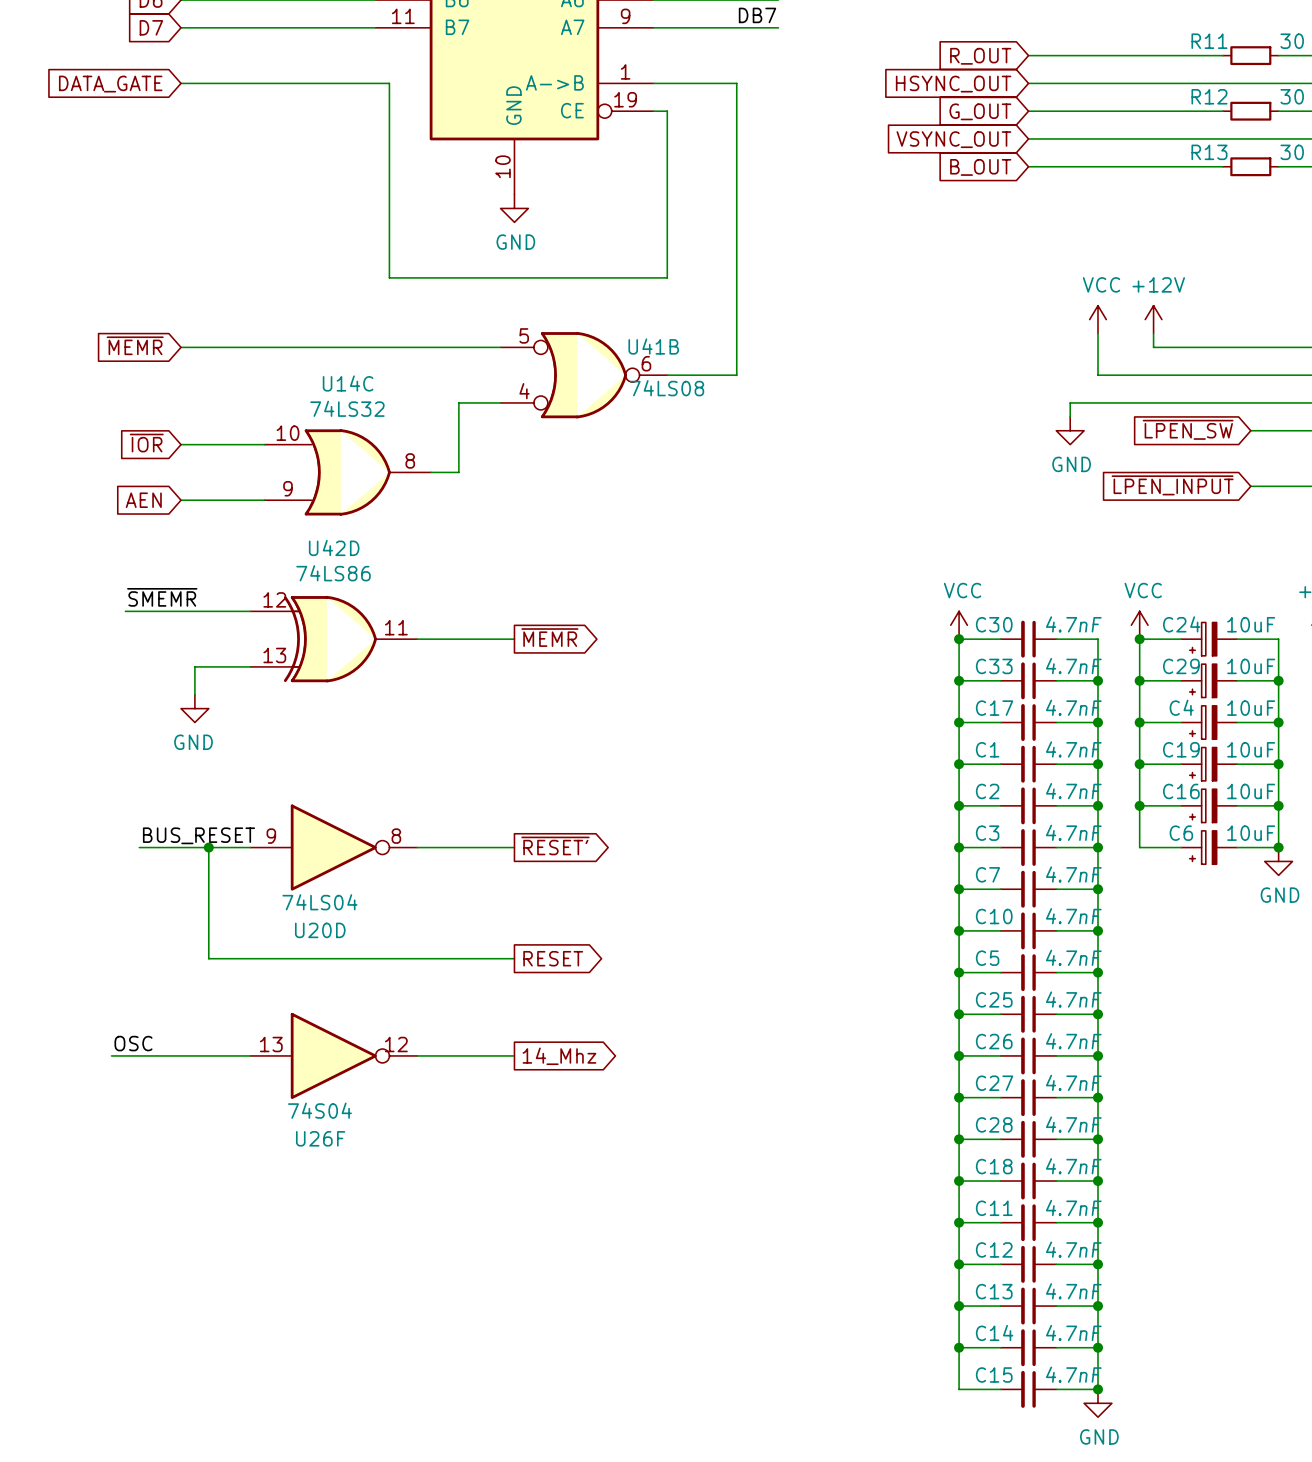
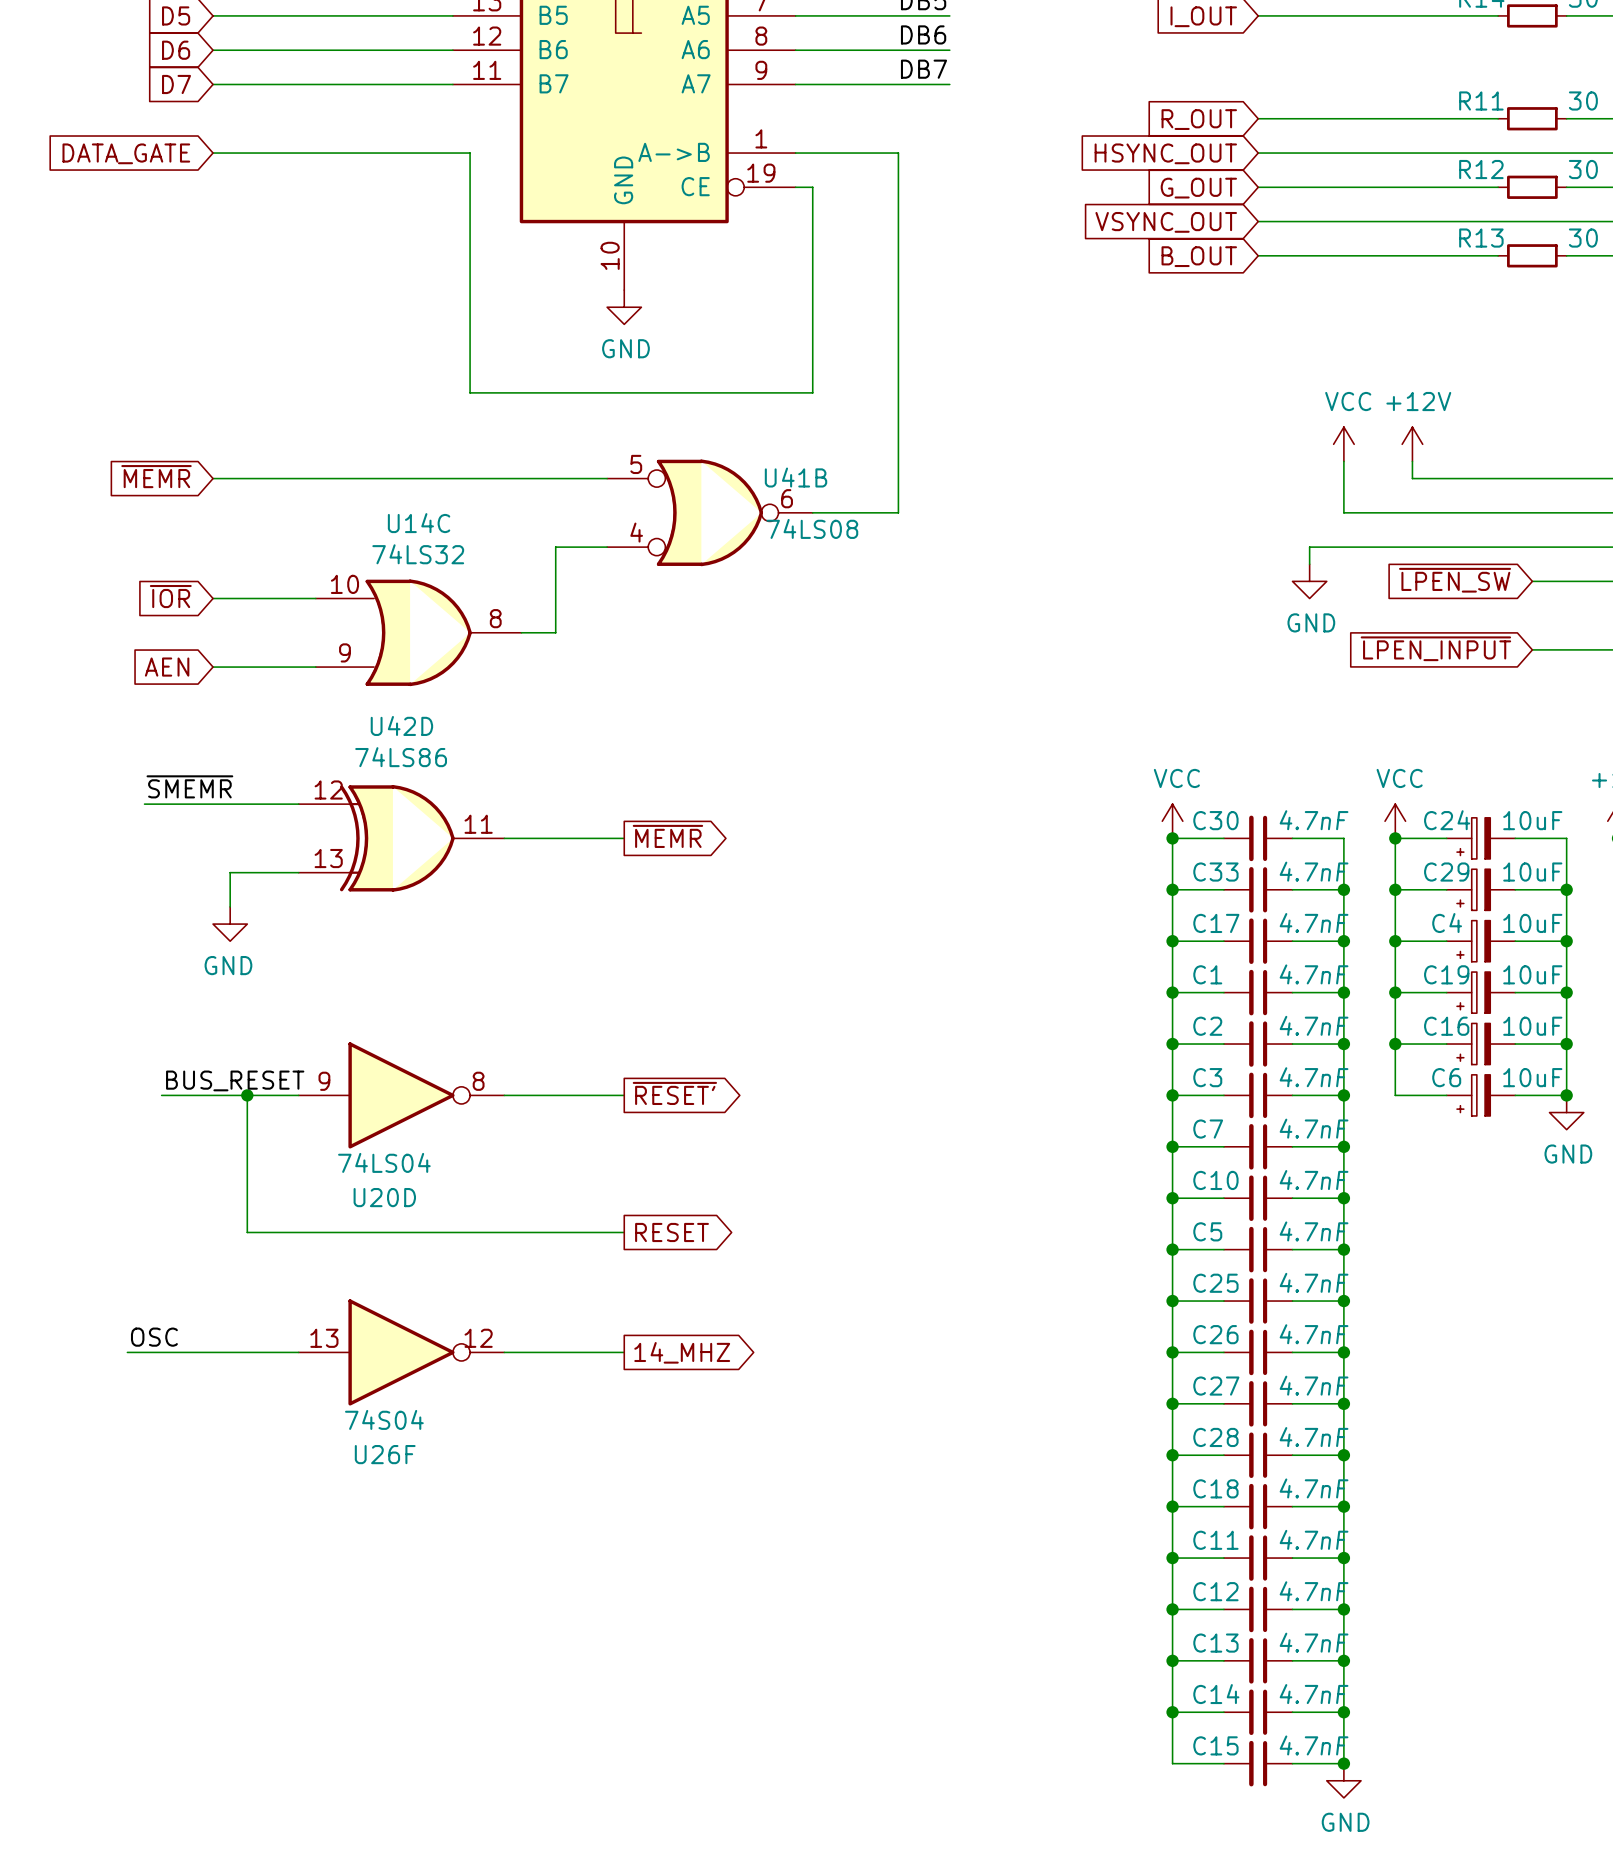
global label: 14_Mhz (559, 1056) -> 14_MHZ (682, 1352)

